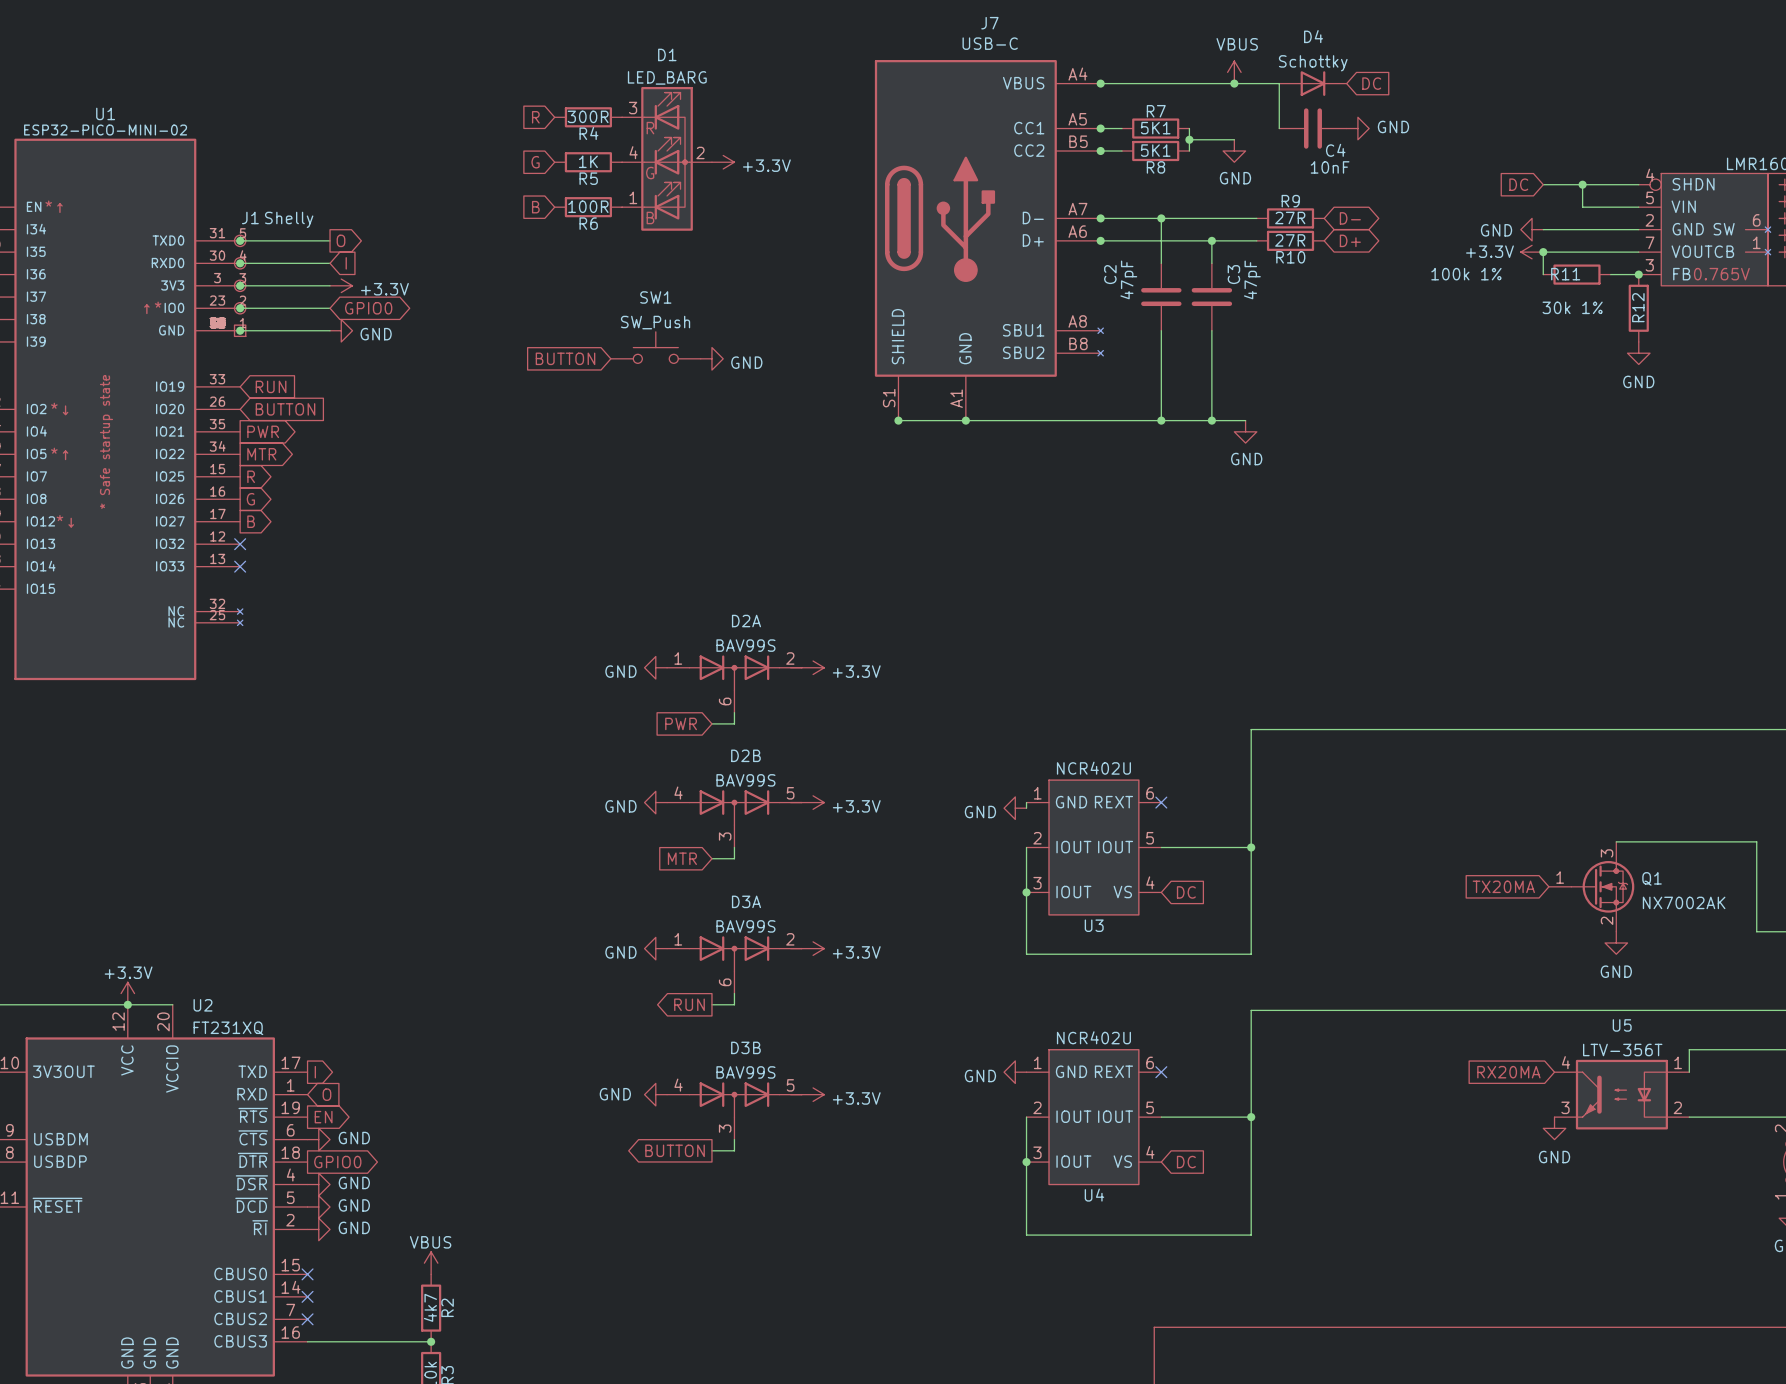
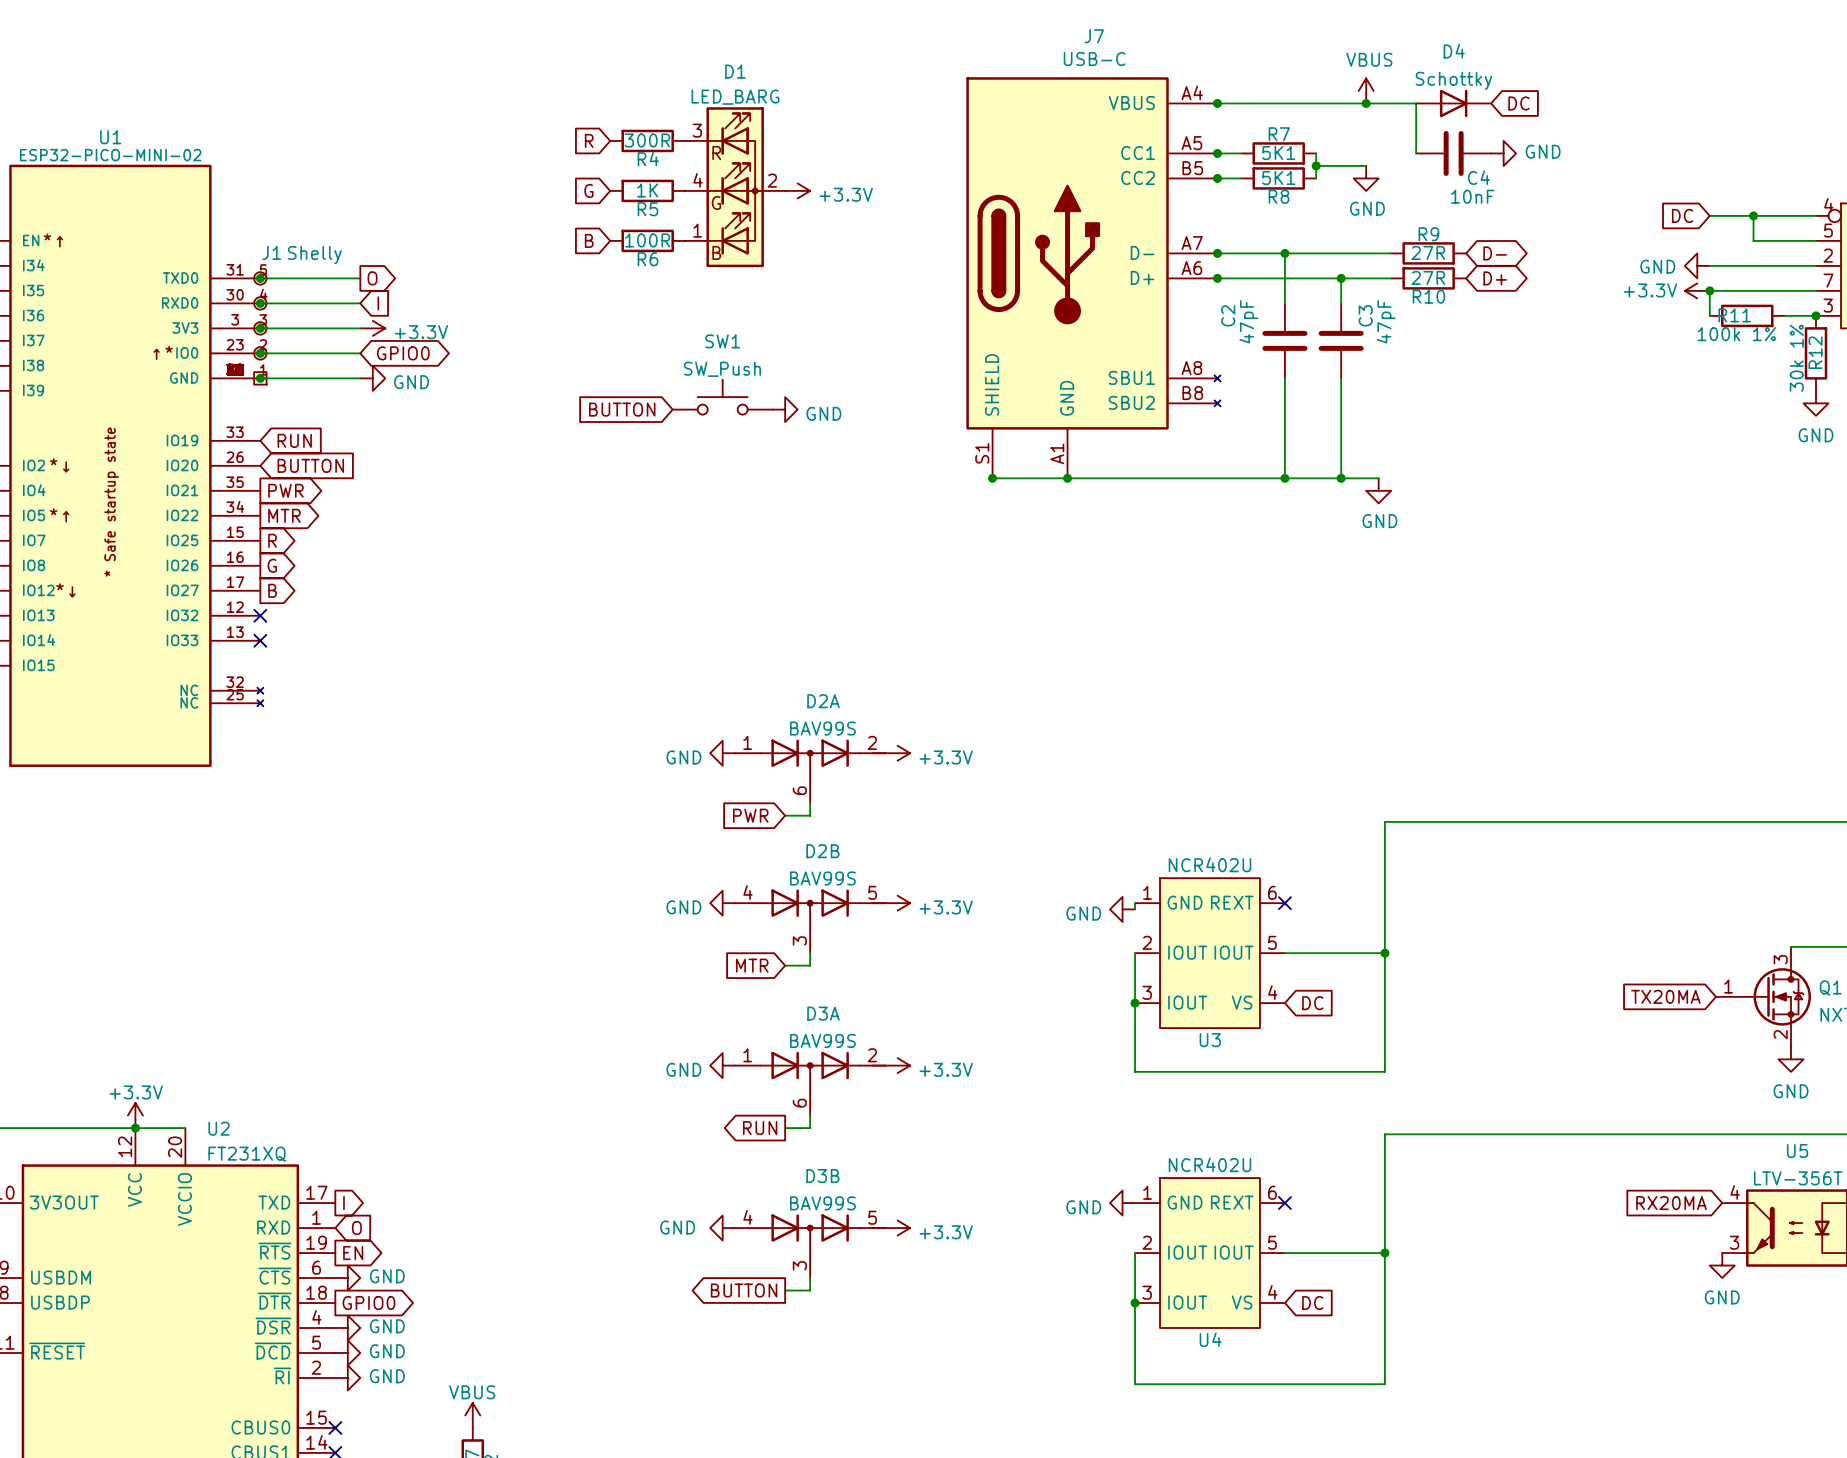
R11 value position: 100k 1% (1466, 274) -> 100k 1% (1736, 334)
R12 value rotation: 0° (1572, 307) -> 90° counterclockwise (1796, 358)

